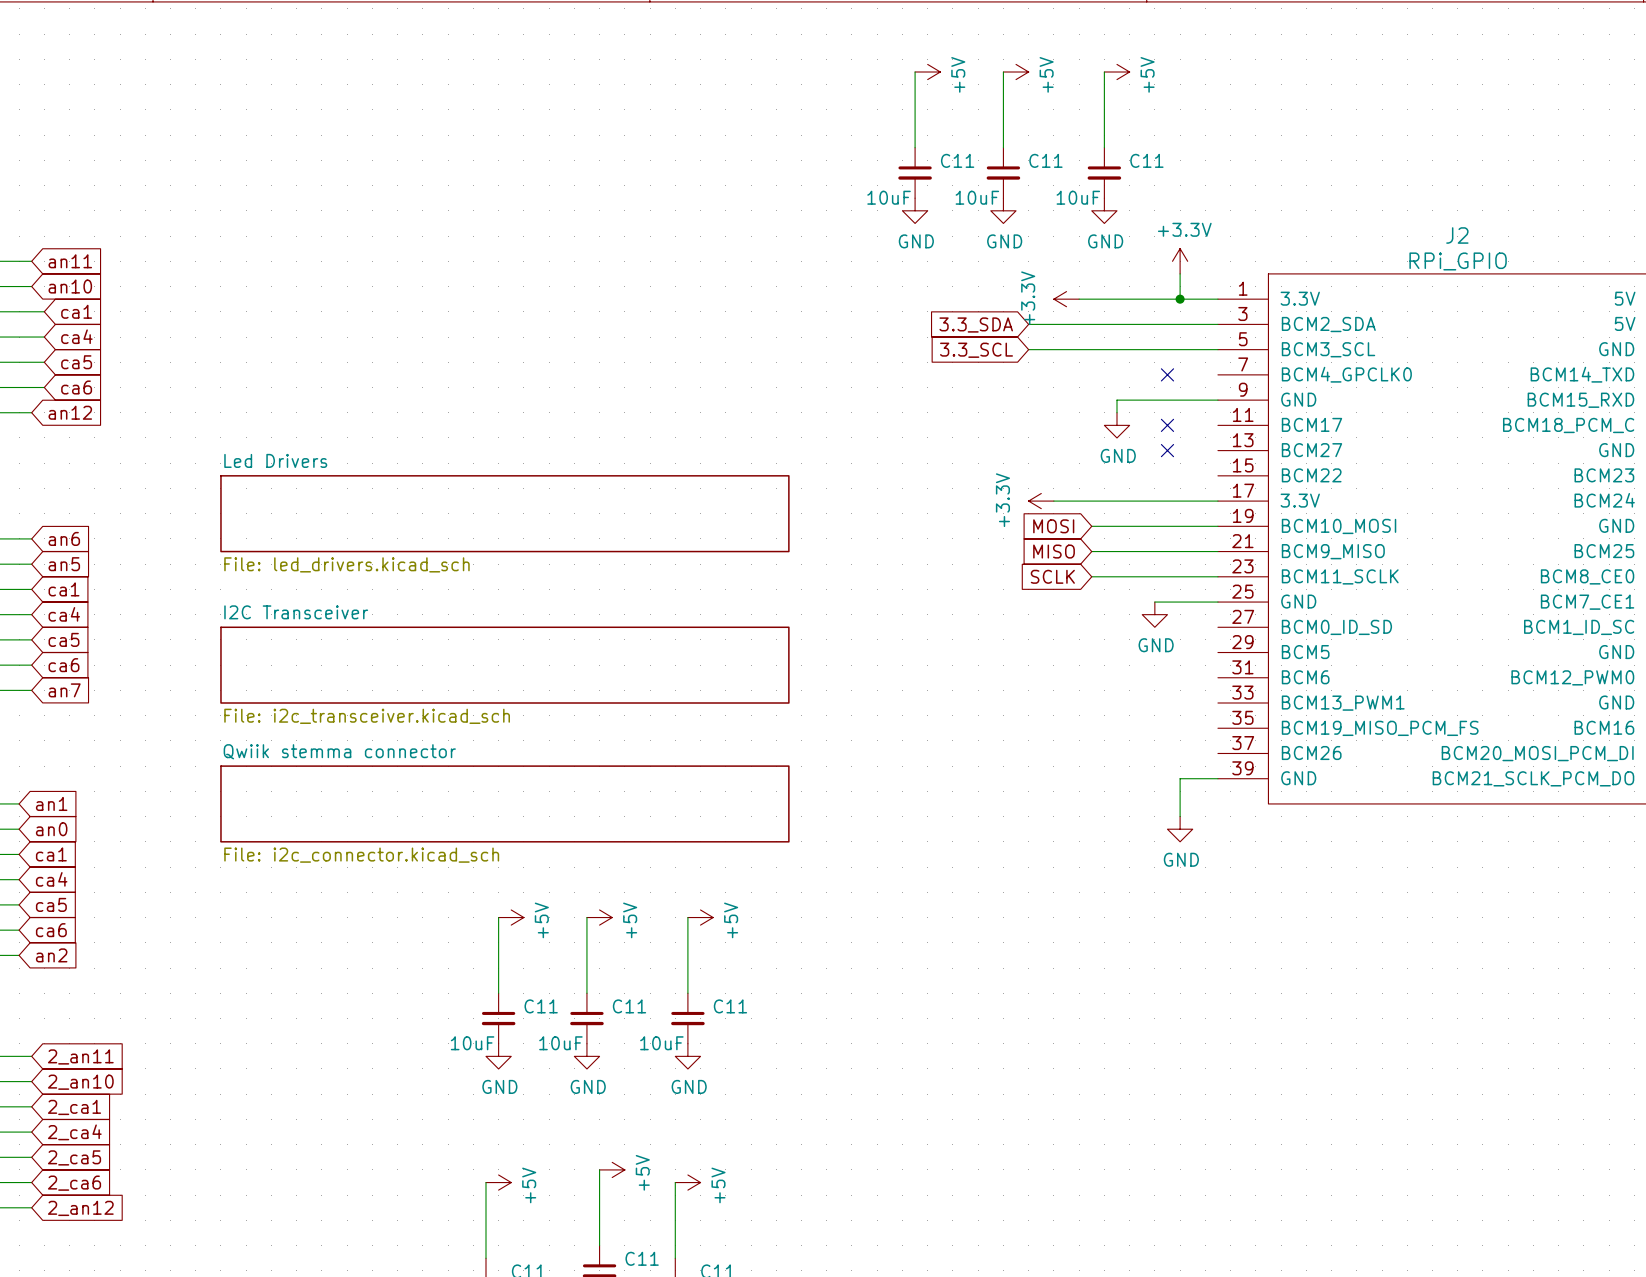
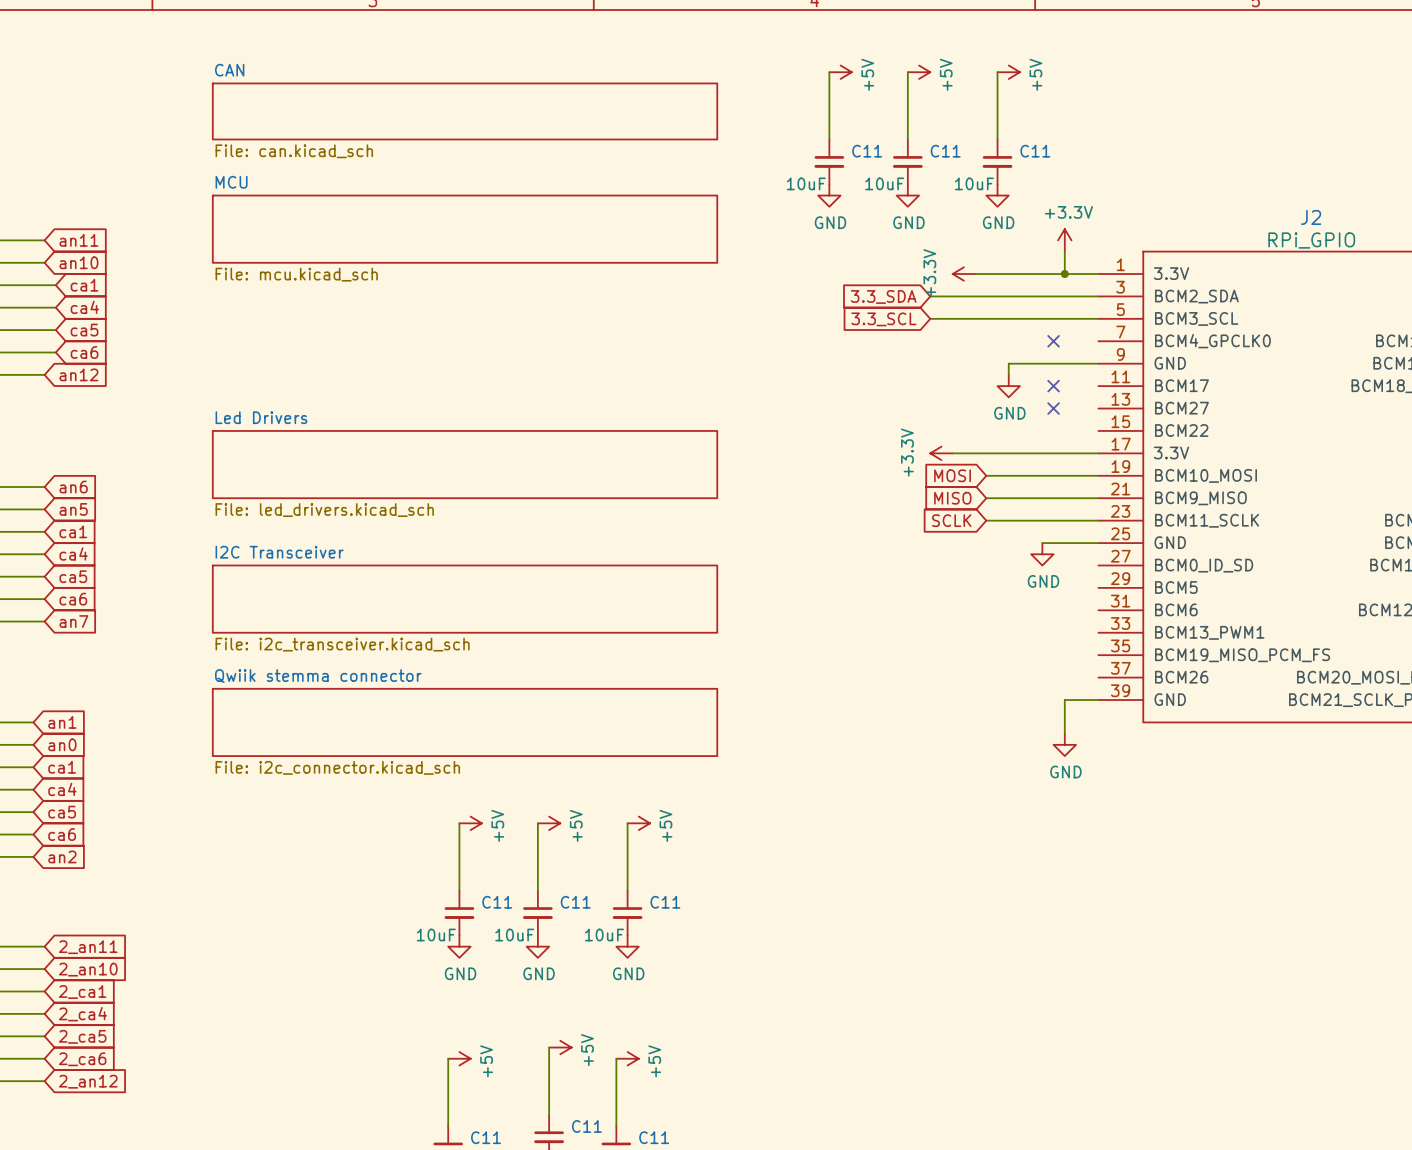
sheet CAN: none -> File: can.kicad_sch (465, 111)
sheet MCU: none -> File: mcu.kicad_sch (465, 229)

